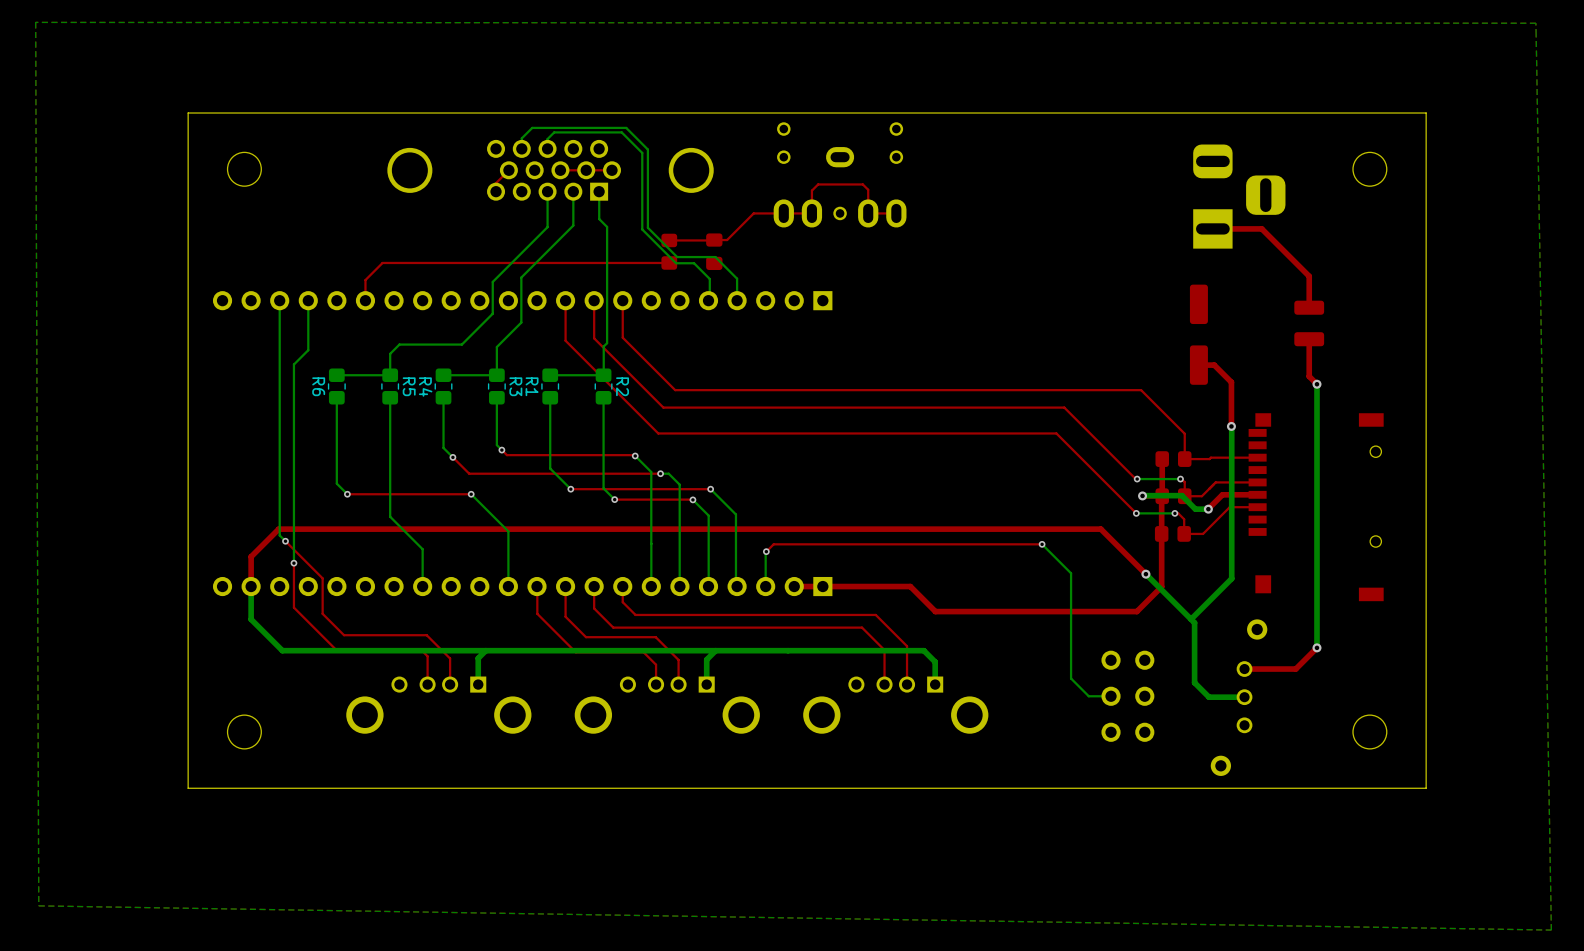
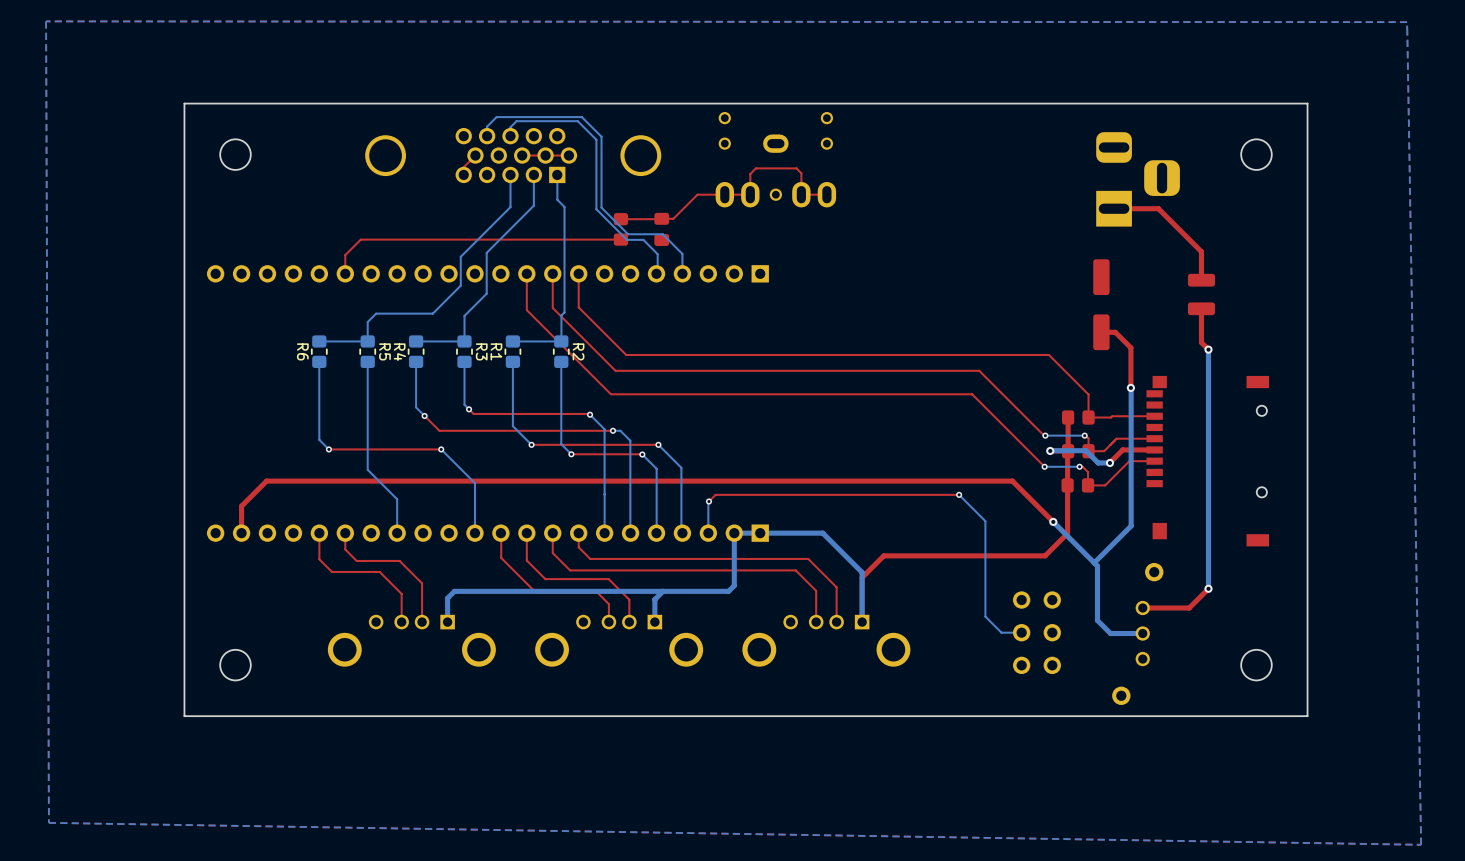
bottom track: (279, 300) (279, 535) (285, 541) -> none
bottom track: (308, 300) (308, 350) (293, 364) (293, 563) -> none
top track: (285, 541) (322, 578) (322, 613) (344, 635) (426, 635) (450, 658) -> (345, 533) (345, 549) (356, 560) (399, 560) (422, 583) (422, 598)
via: (285, 541) -> none
top track: (293, 563) (293, 607) (336, 650) (421, 650) (427, 656) -> (319, 533) (319, 559) (331, 571) (379, 571) (401, 593) (401, 596)
via: (293, 563) -> none
bottom track: (251, 586) (251, 619) (282, 650) (485, 650) -> none
top track: (794, 586) (910, 586) (935, 611) (959, 611) -> (862, 622) (862, 577) (883, 555)
bottom track: (788, 650) (923, 650) (935, 661) -> (728, 591) (734, 585) (734, 533) (822, 533) (862, 572) (862, 601)

